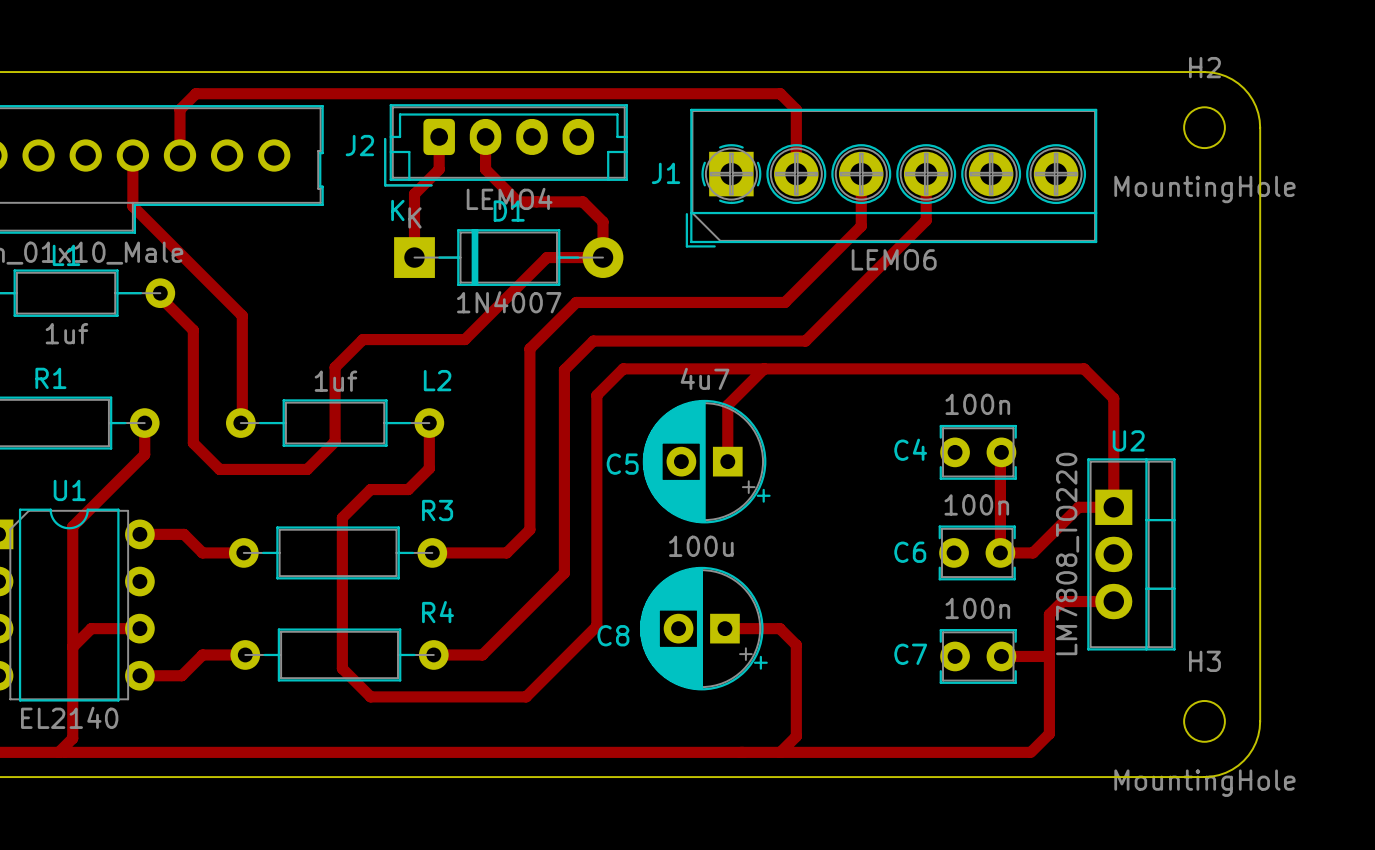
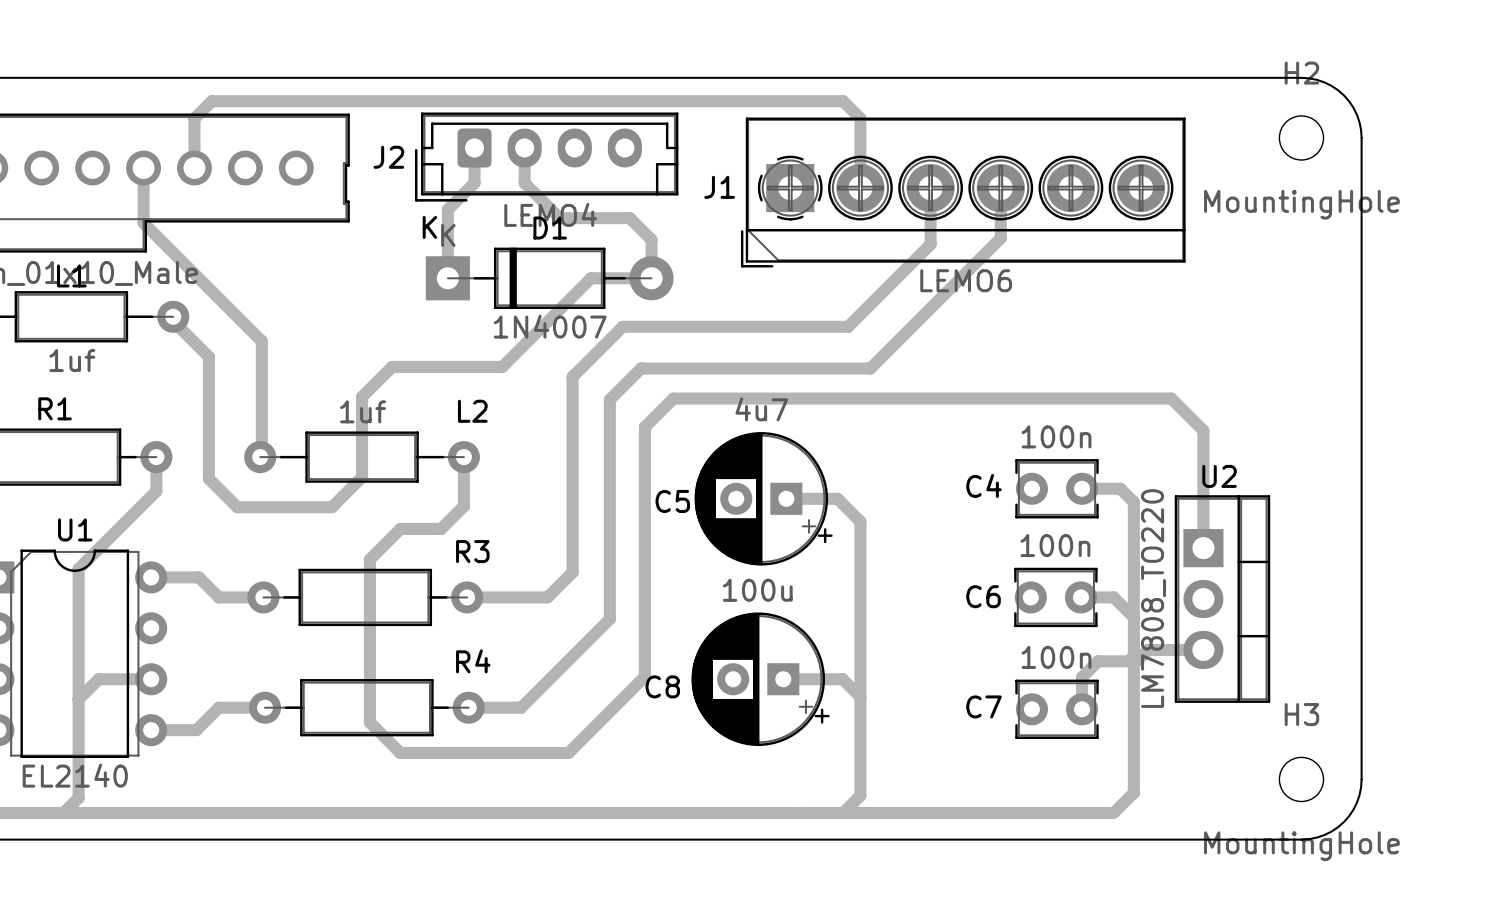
track: (764, 368) (727, 405) (727, 461) -> (860, 696) (860, 521) (837, 498) (786, 498)
track: (1001, 452) (1000, 552) -> (1082, 488) (1120, 488) (1133, 502) (1133, 664)
track: (1113, 507) (1078, 507) (1030, 552) -> (1133, 617) (1113, 597)
track: (1001, 656) (1049, 656) -> (1082, 709) (1082, 677) (1098, 661) (1128, 661) (1133, 656)

